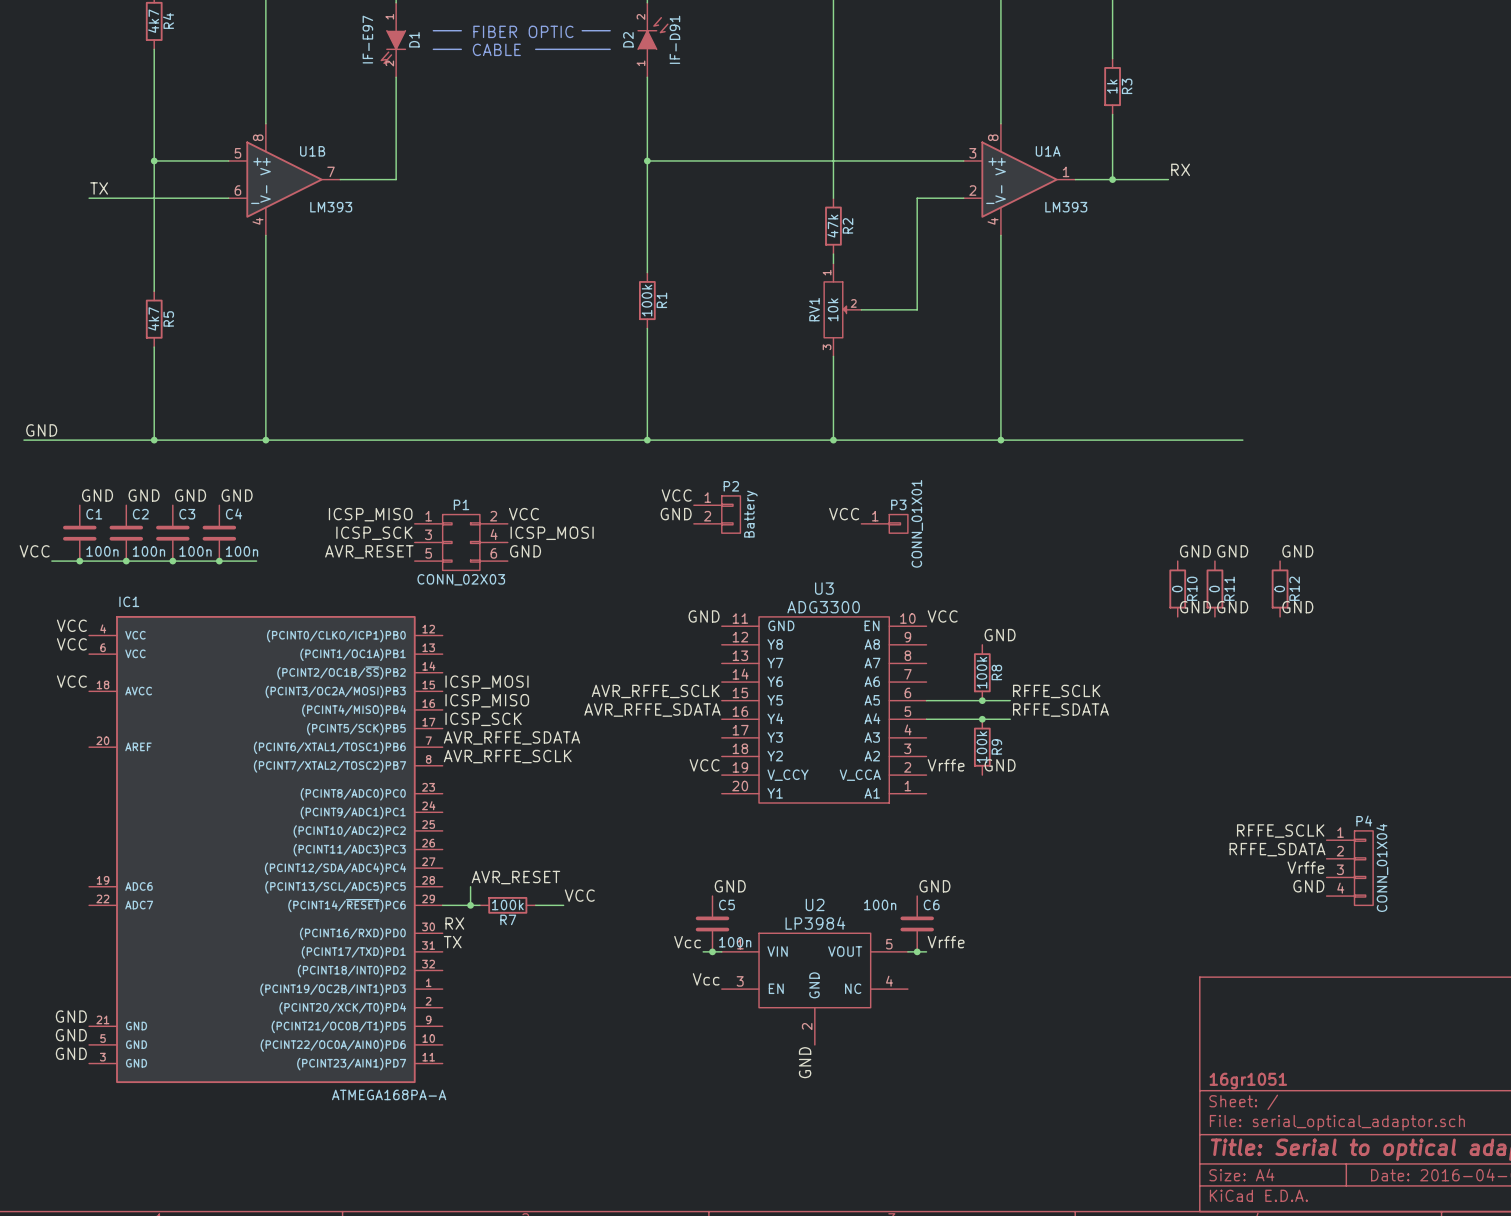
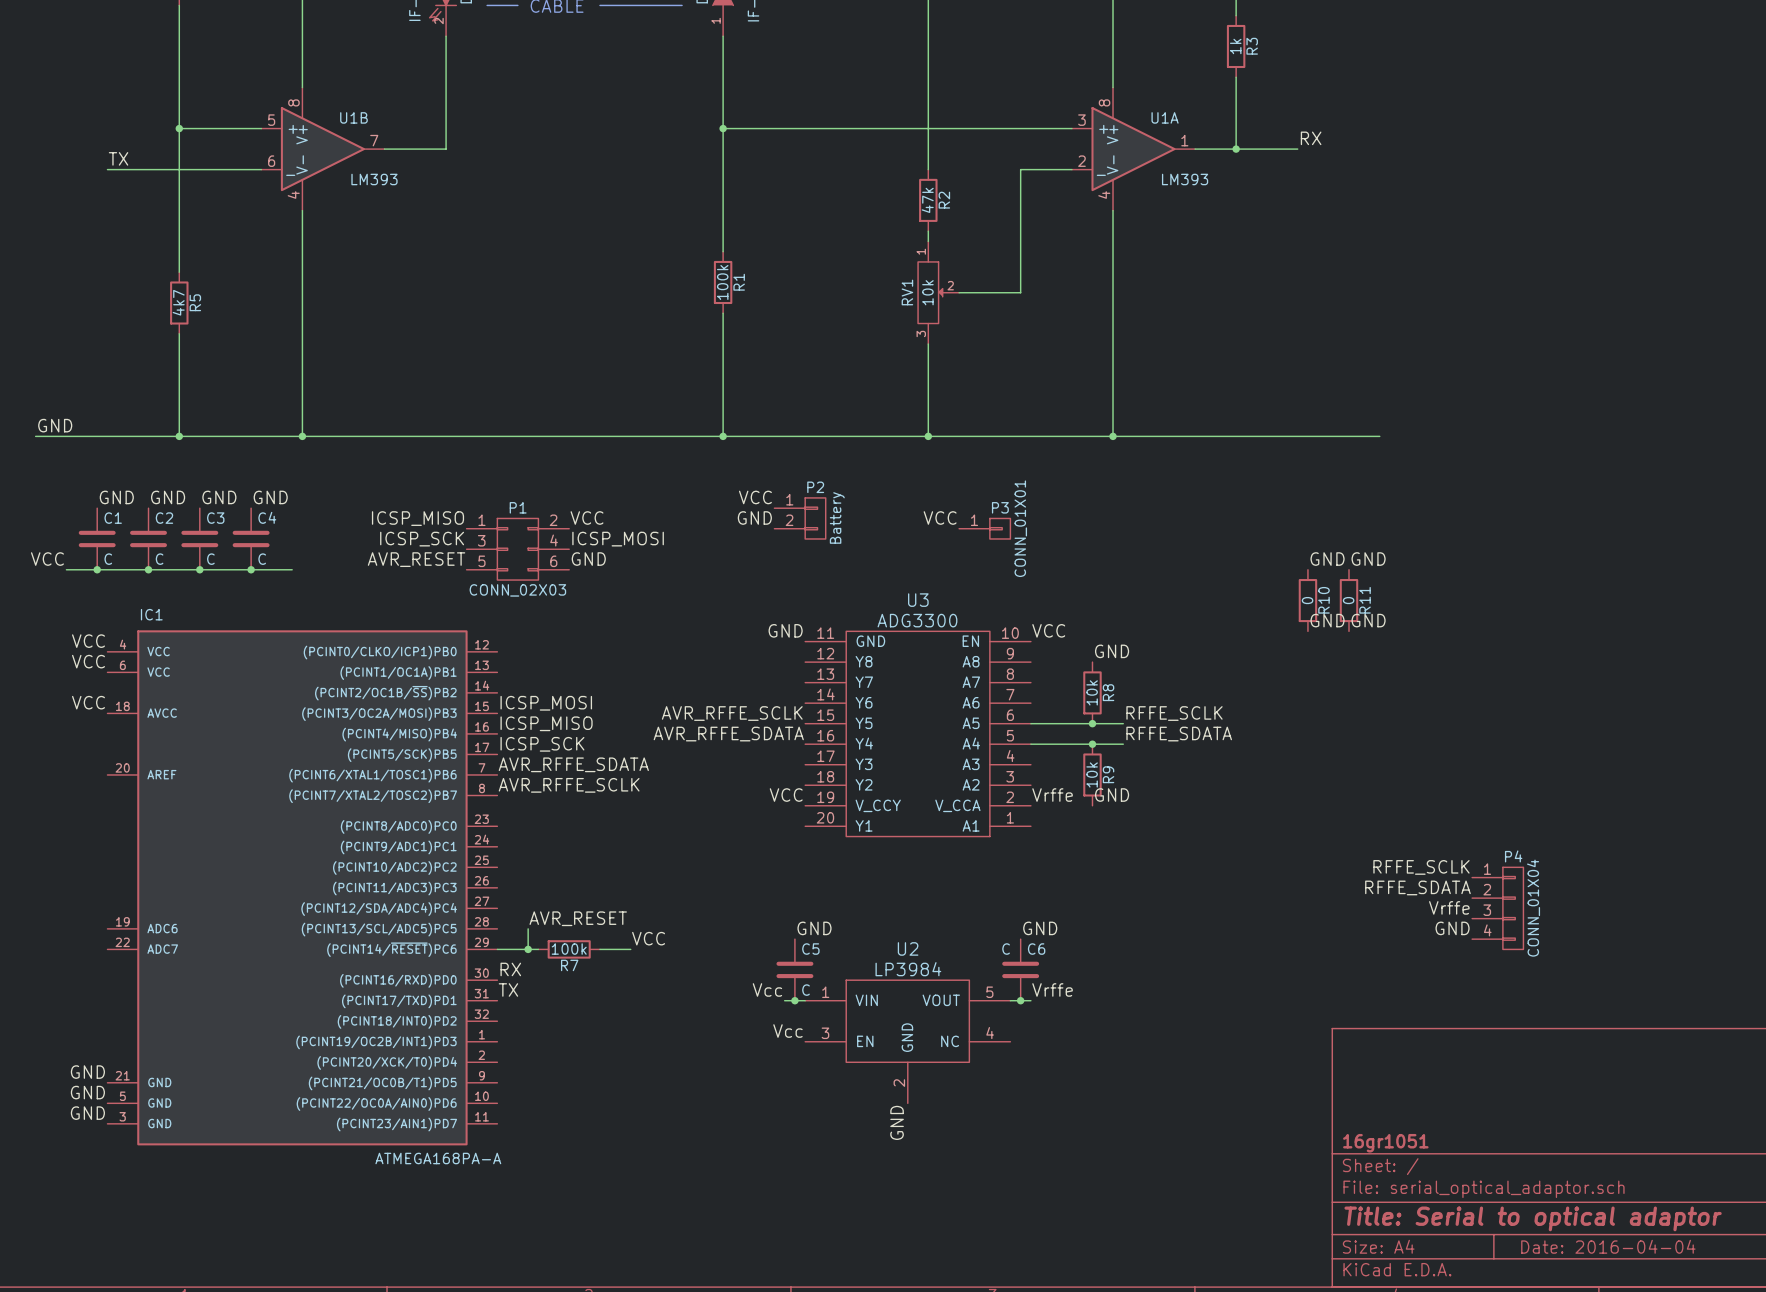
C1 value: 100n (102, 551) -> C (108, 559)
C2 value: 100n (148, 551) -> C (159, 559)
C3 value: 100n (195, 551) -> C (210, 559)
C4 value: 100n (242, 551) -> C (262, 559)
label: GND (1297, 551) -> none
R12: 0 (1280, 589) -> none
label: GND (1297, 607) -> none
R8 value: 100k (981, 672) -> 10k (1092, 692)
R9 value: 100k (981, 747) -> 10k (1092, 774)
C6 value: 100n (880, 905) -> C (1006, 949)
C5 value: 100n (735, 942) -> C (806, 990)

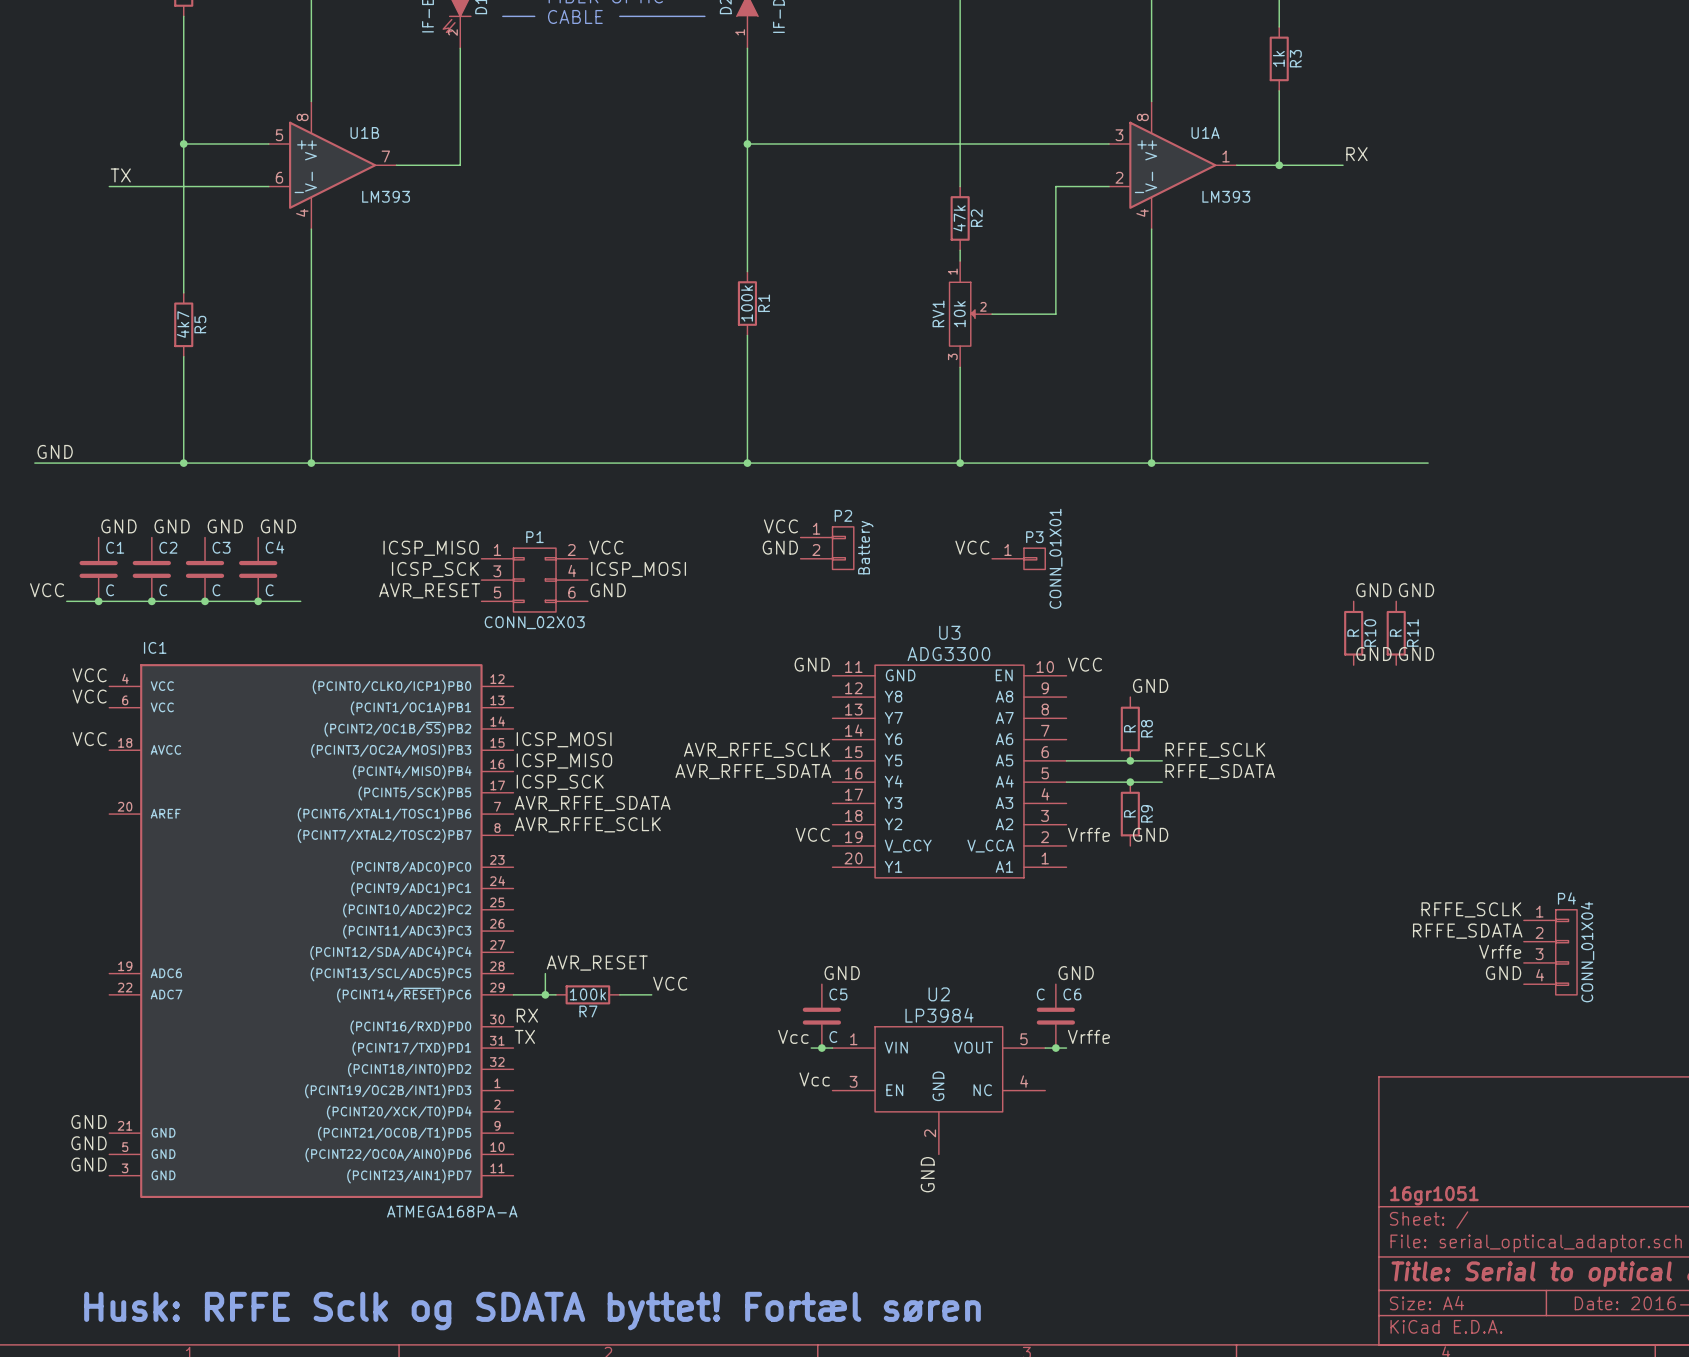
R10 value: 0 (1307, 600) -> R (1353, 632)
R11 value: 0 (1348, 600) -> R (1395, 632)
R8 value: 10k (1092, 692) -> R (1129, 728)
R9 value: 10k (1092, 774) -> R (1129, 813)
text: none -> Husk: RFFE Sclk og SDATA byttet! Fortæl søren (532, 1311)

